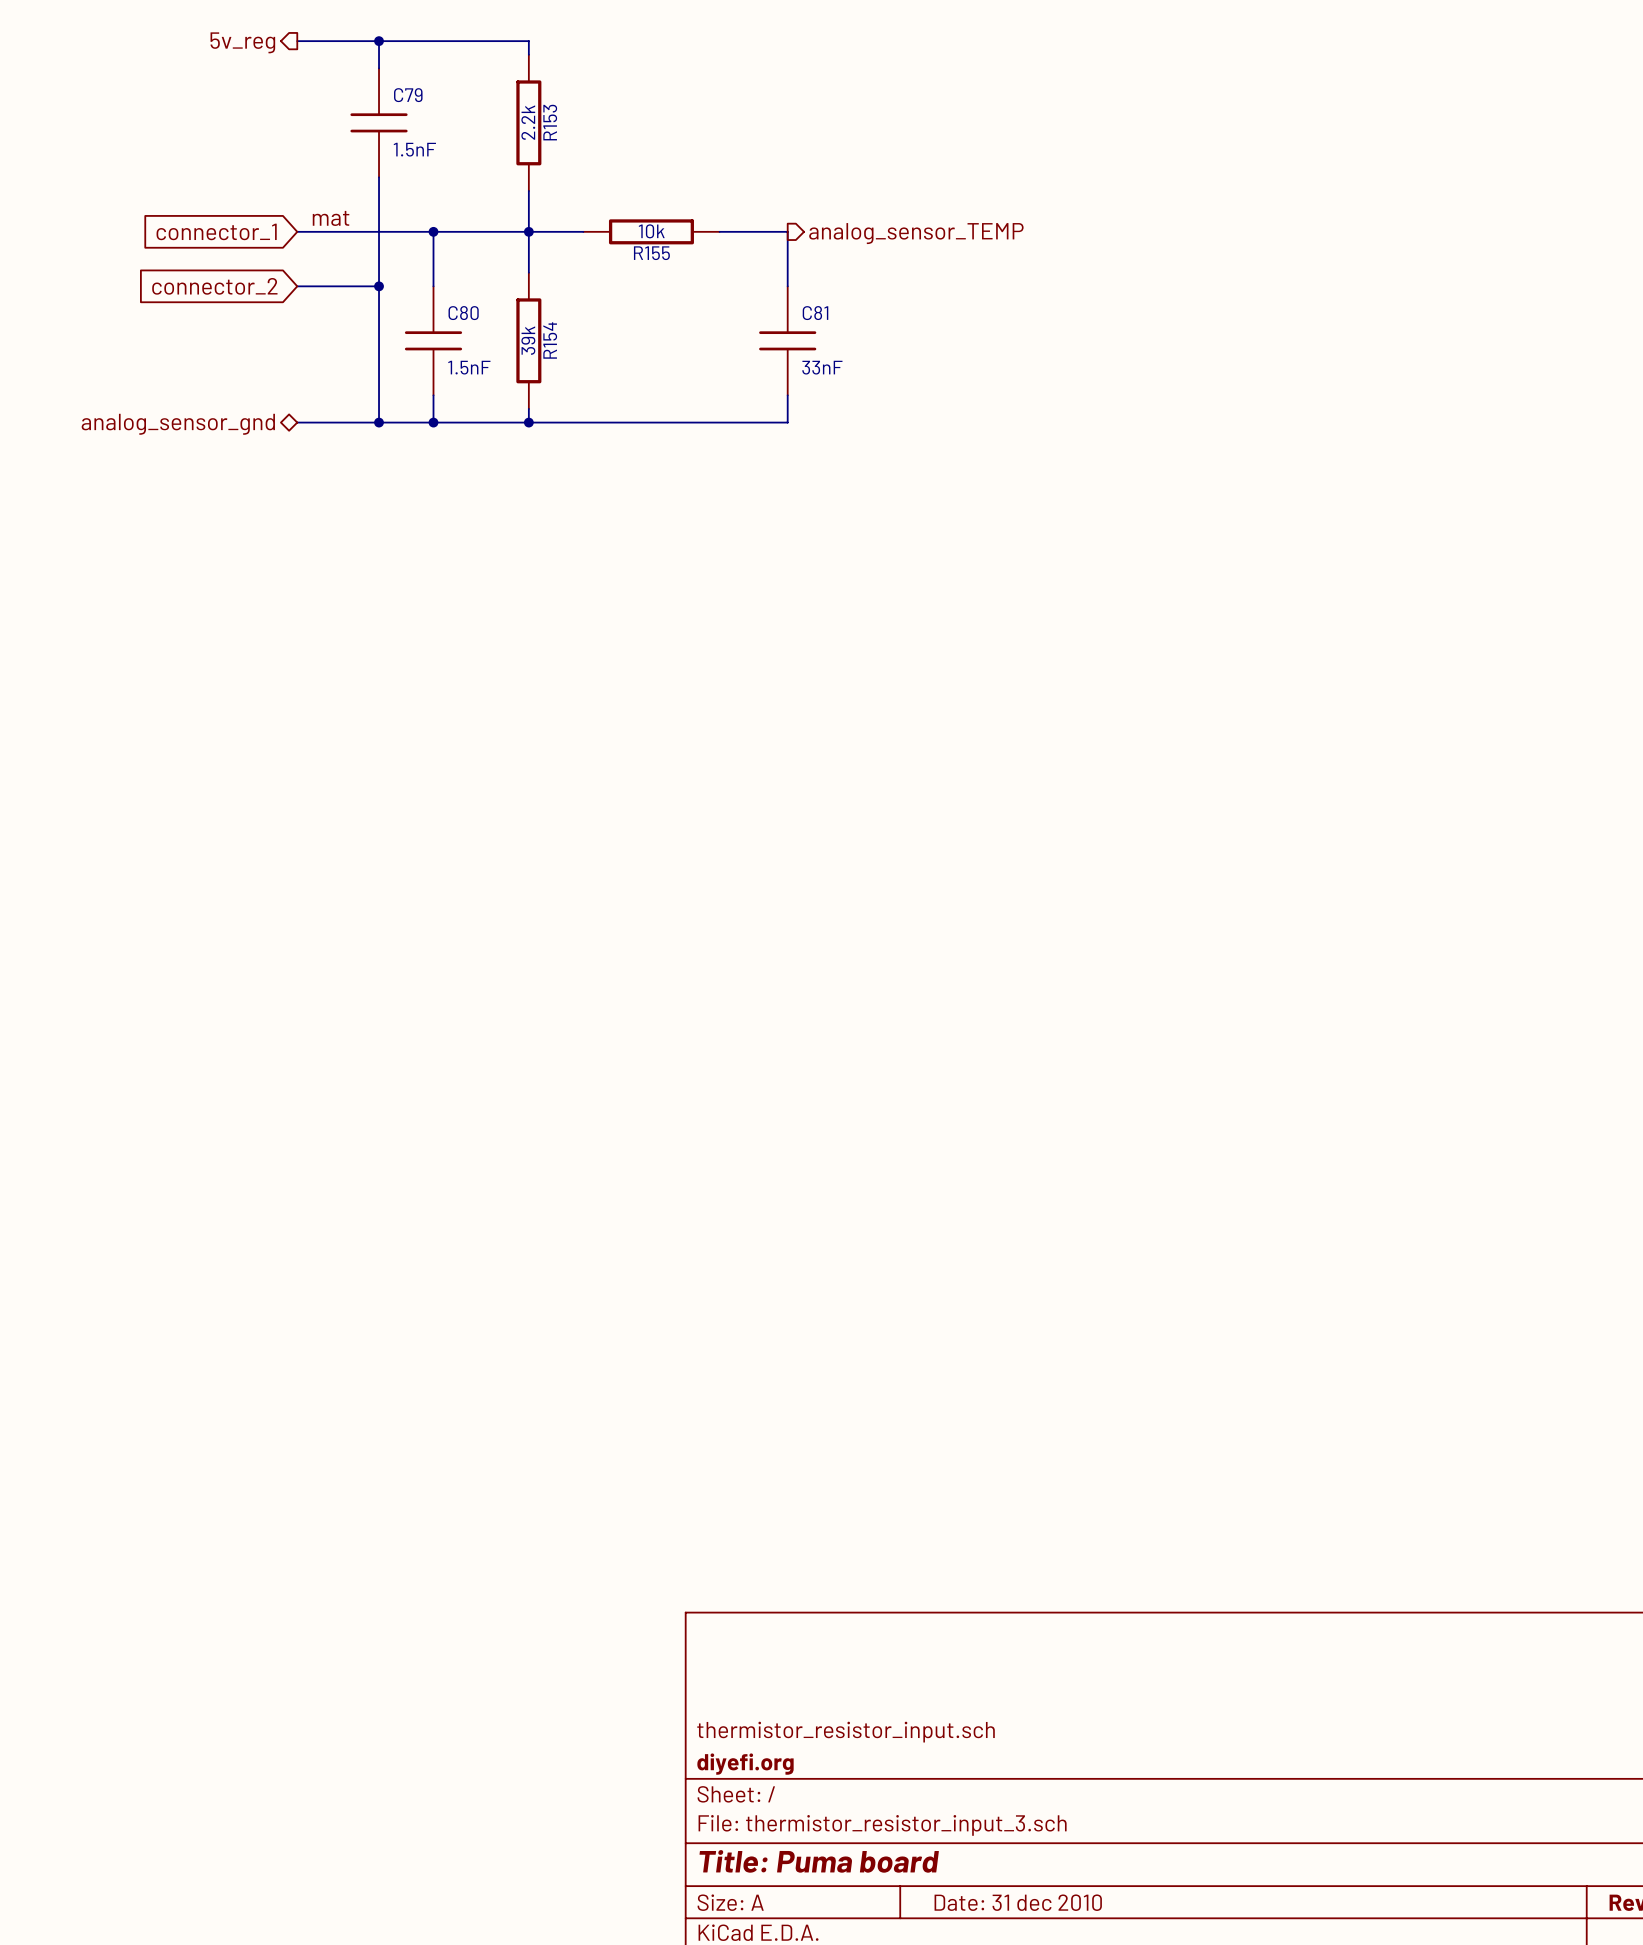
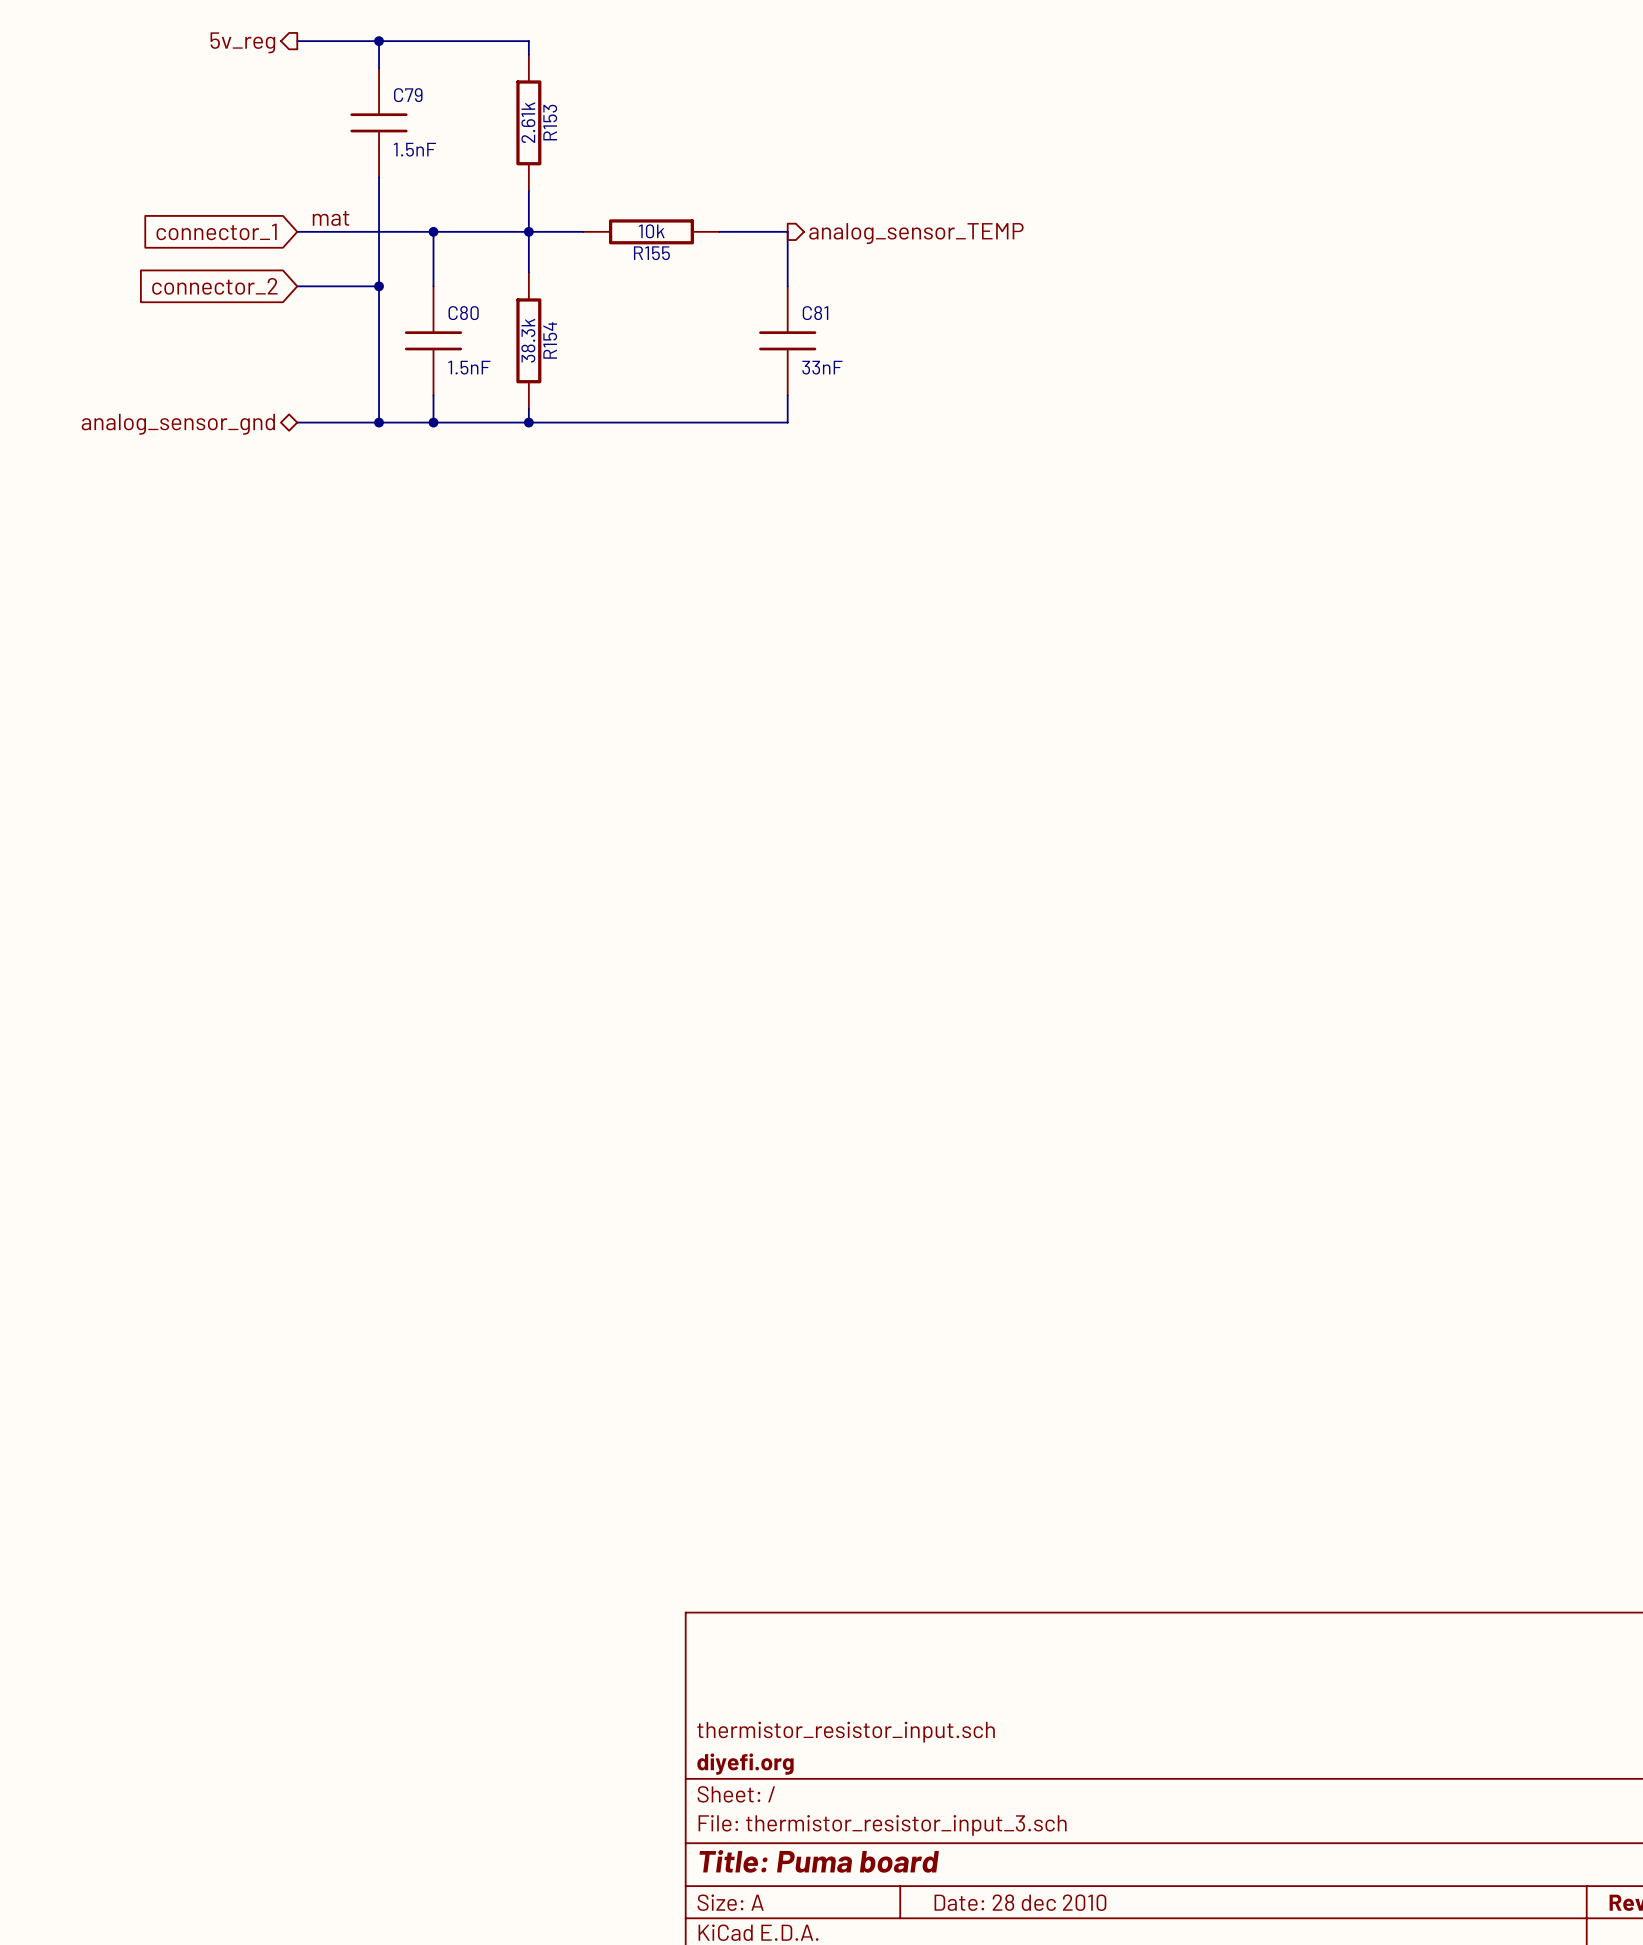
R153 value: 2.2k (528, 122) -> 2.61k (528, 122)
R154 value: 39k (528, 340) -> 38.3k (528, 340)
title block: Date: 31 dec 2010 (1018, 1902) -> Date: 28 dec 2010 (1020, 1902)

